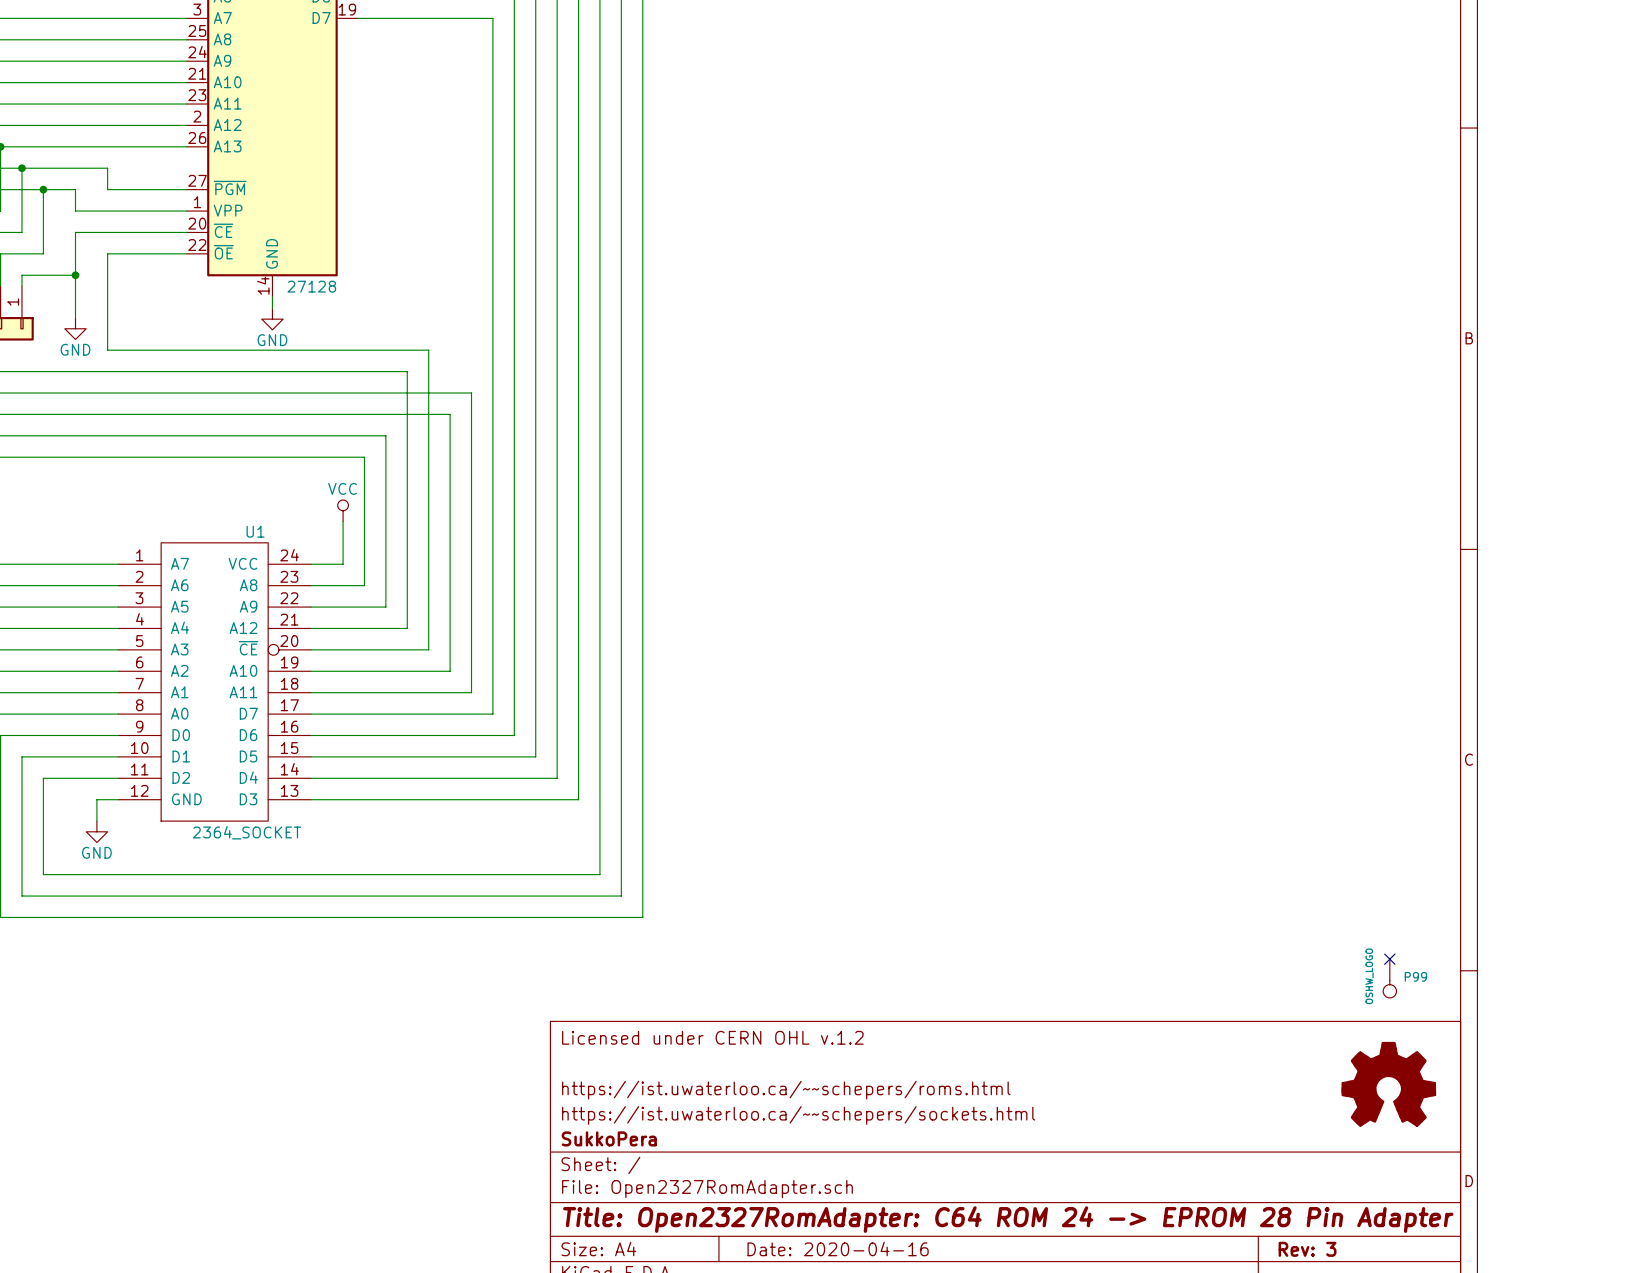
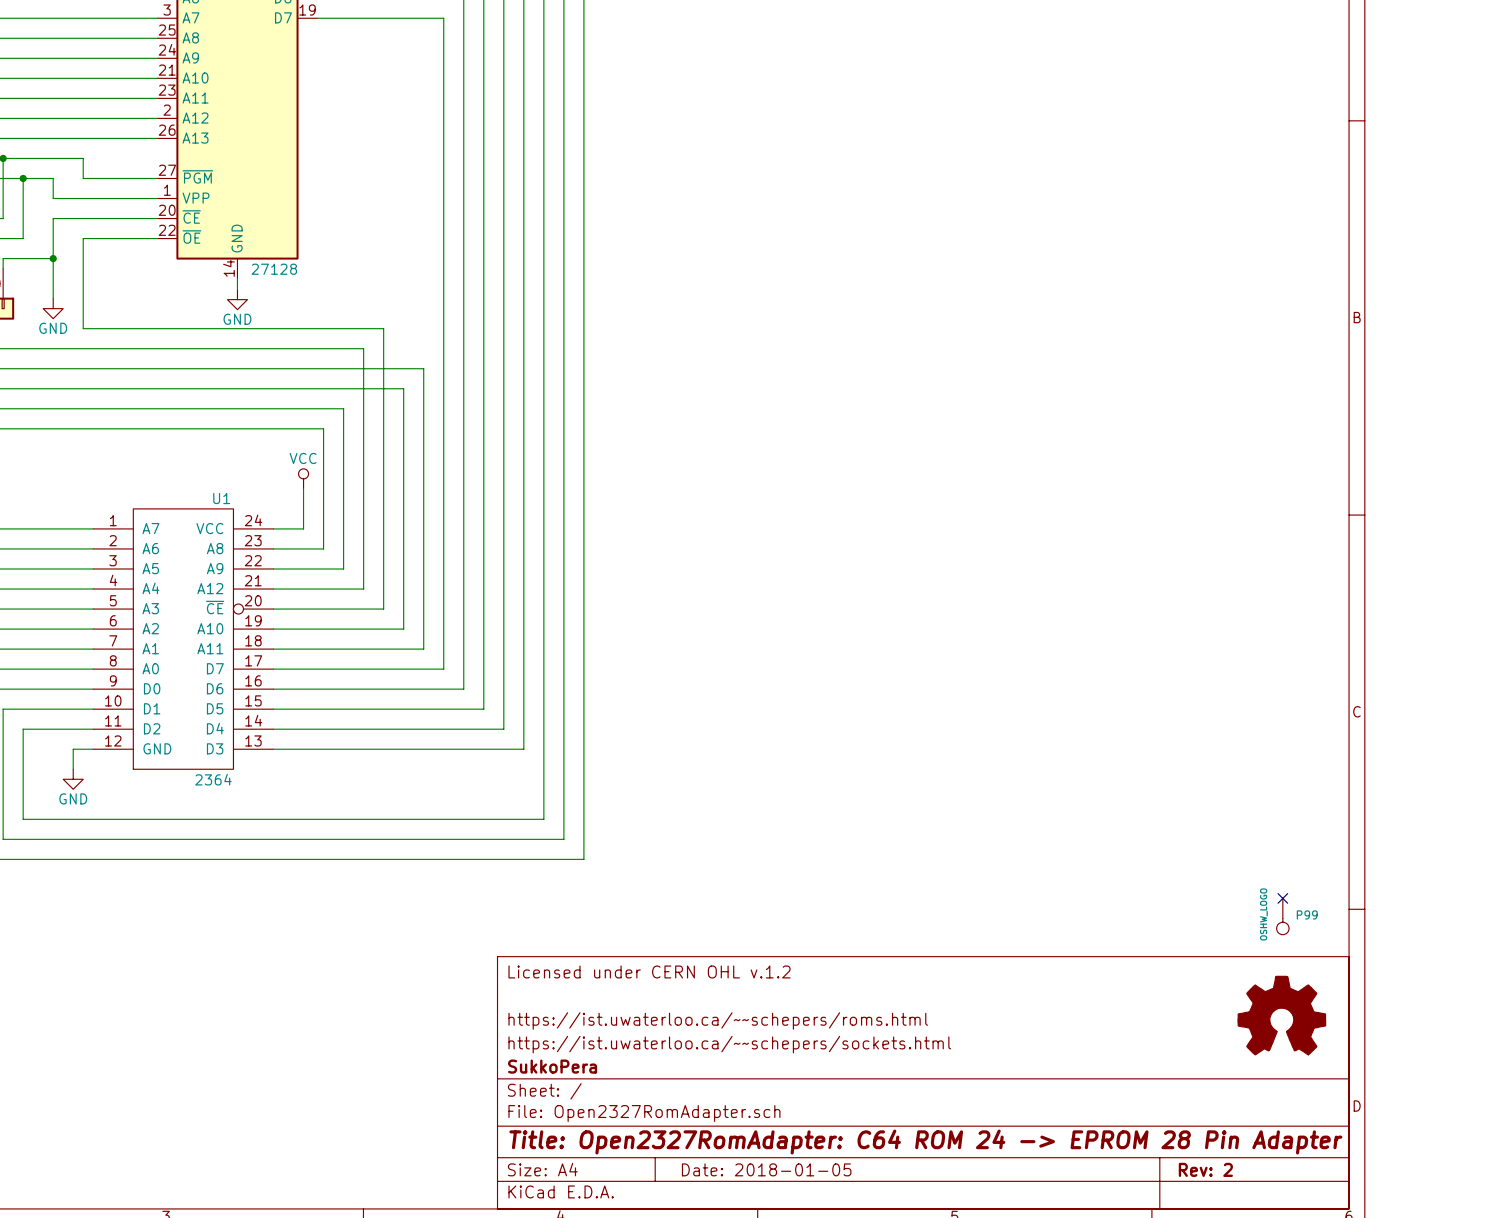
U1 value: 2364_SOCKET (247, 832) -> 2364 (213, 779)
title block: Date: 2020-04-16 (838, 1249) -> Date: 2018-01-05 (766, 1169)
title block: Rev: 3 (1307, 1249) -> Rev: 2 (1205, 1169)

